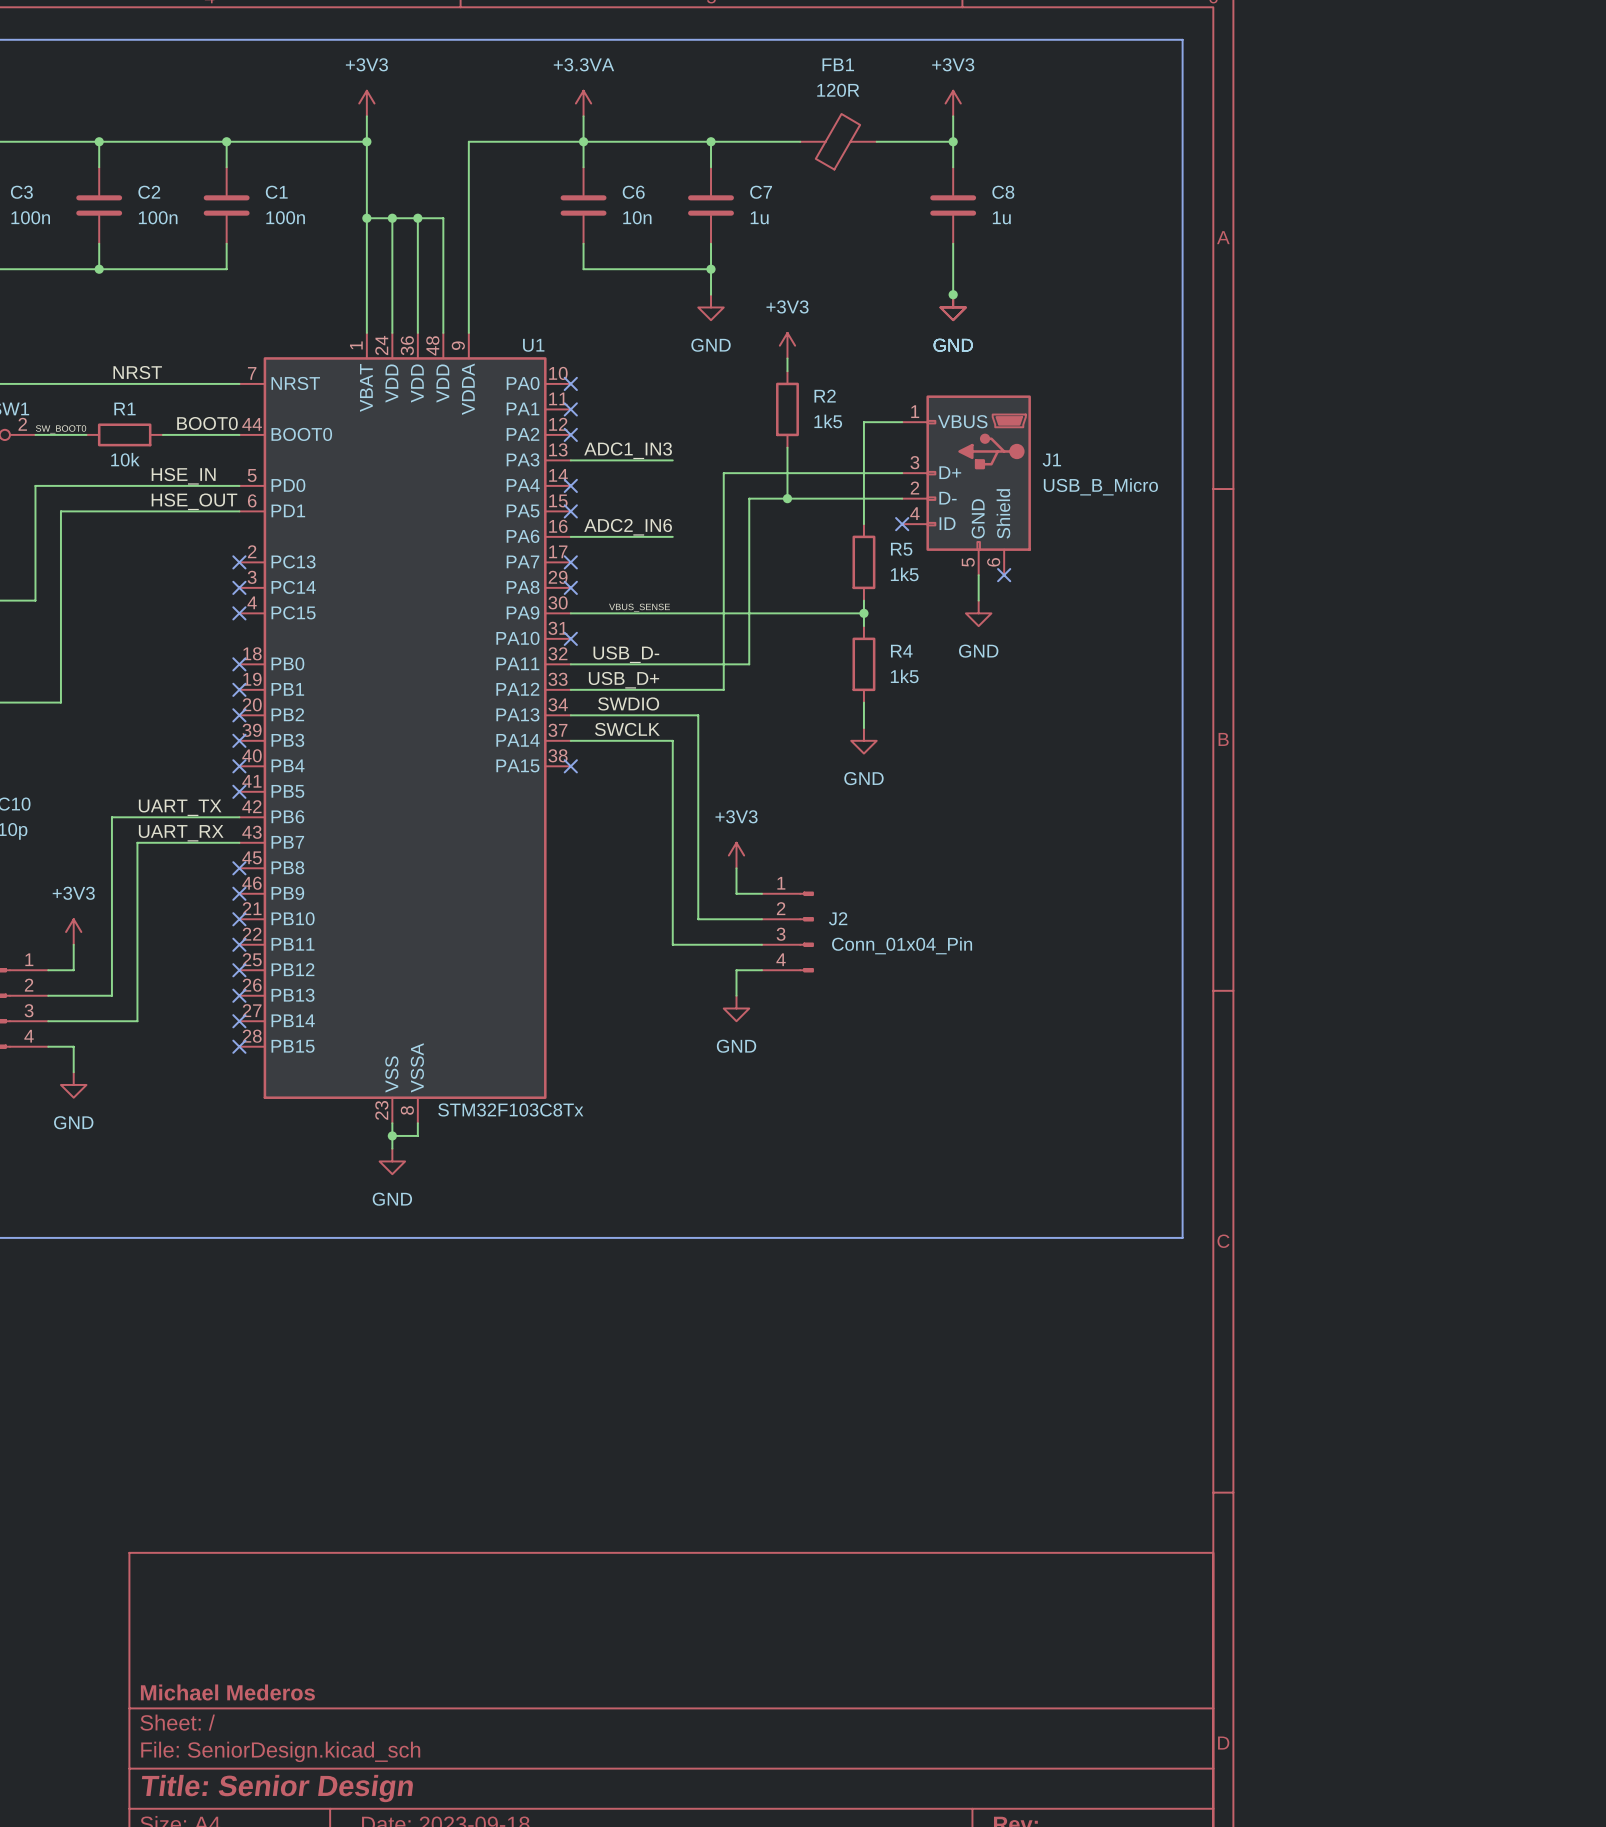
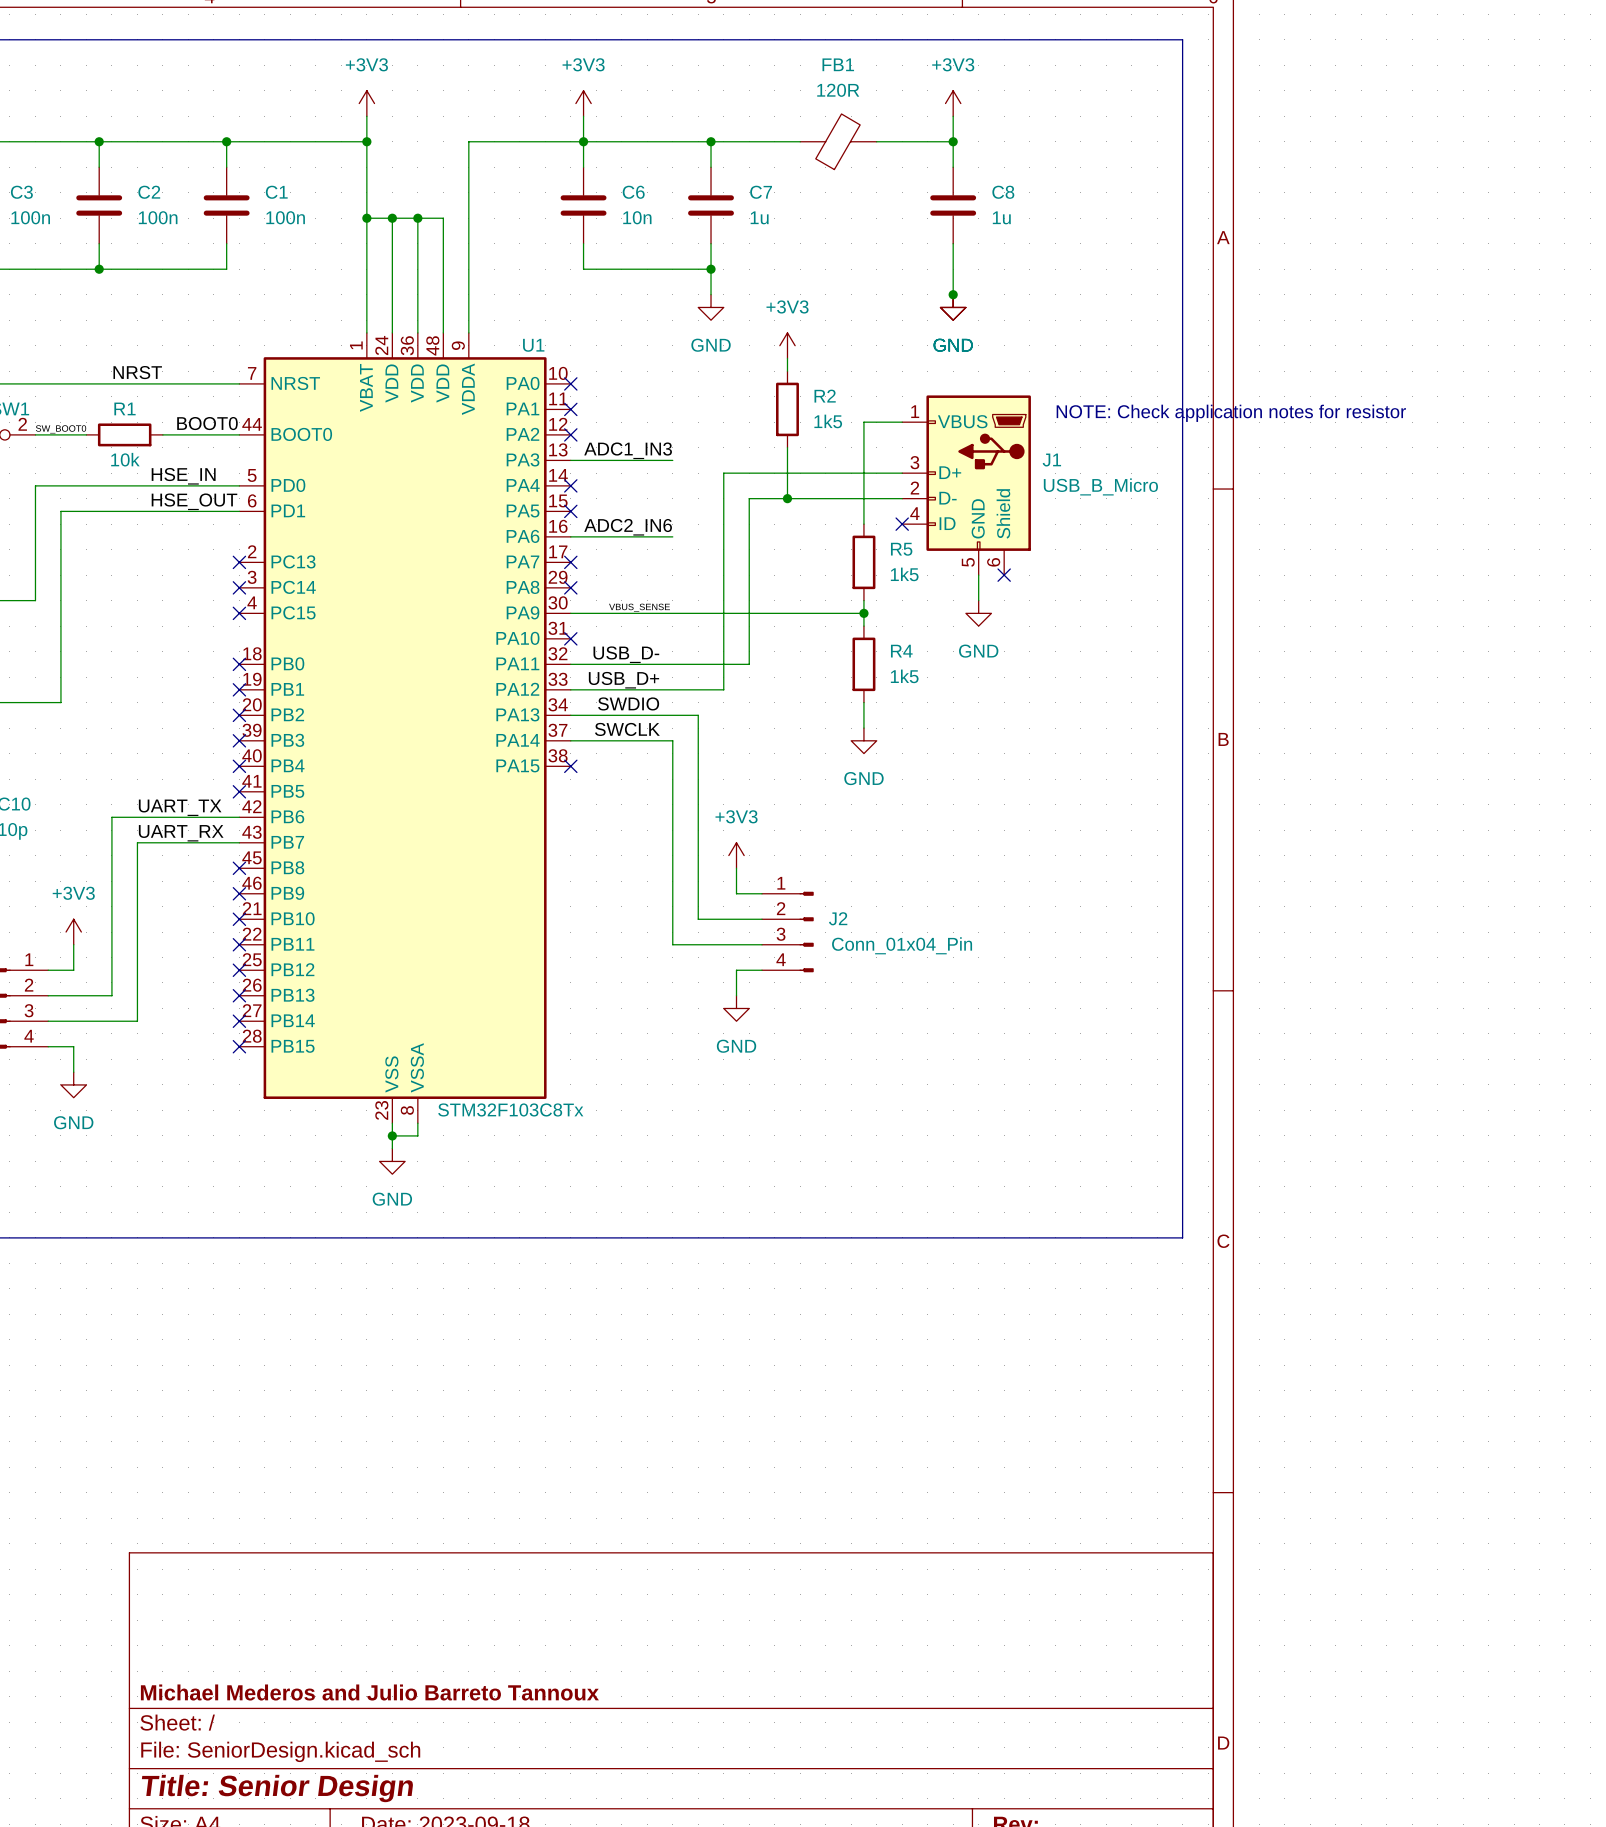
power symbol: +3.3VA (583, 103) -> +3V3 (583, 103)
text: none -> NOTE: Check application notes for resistor (1231, 413)
title block: Michael Mederos (227, 1692) -> Michael Mederos and Julio Barreto Tannoux (369, 1692)

